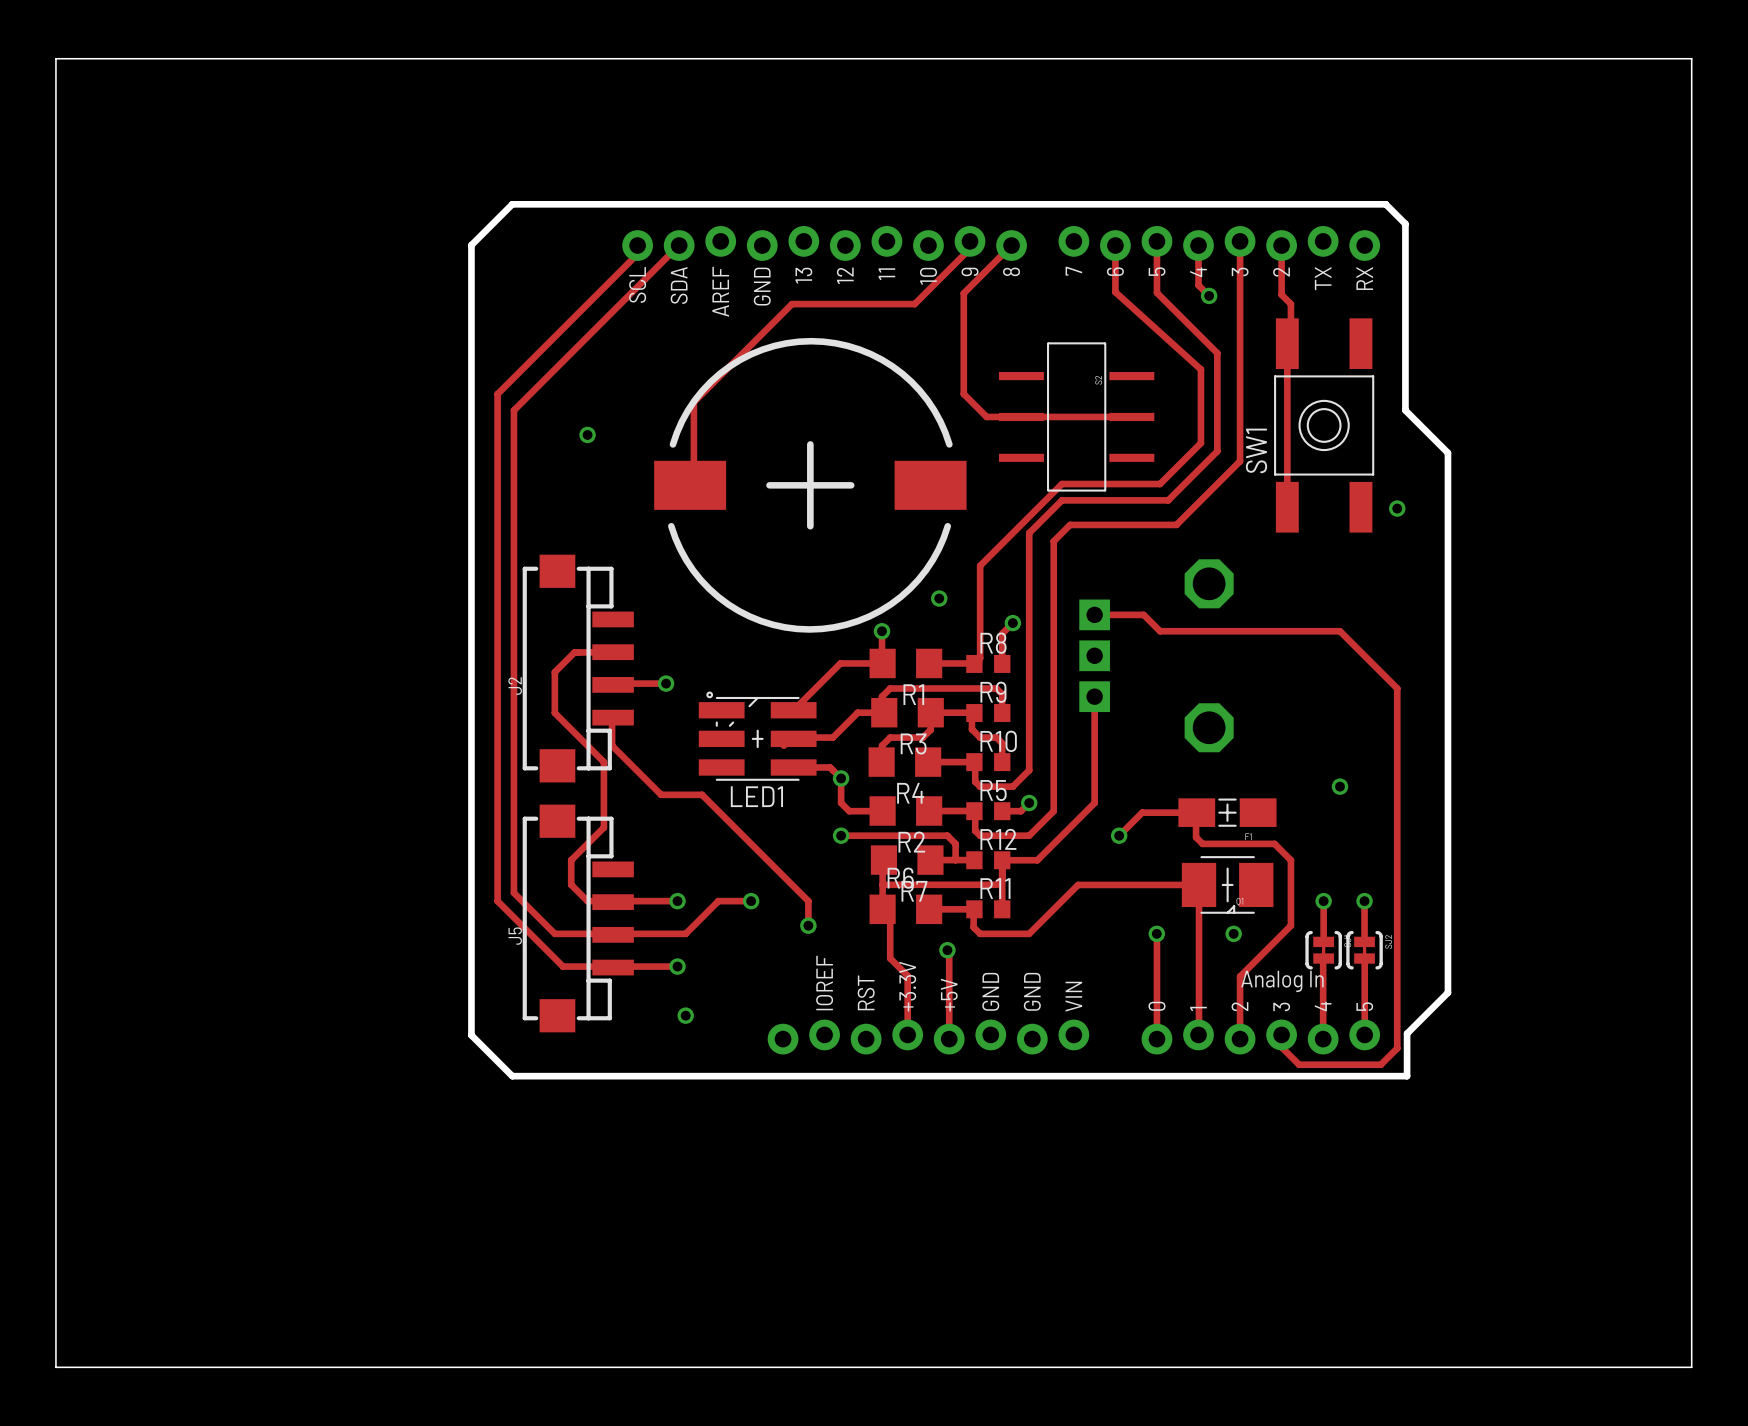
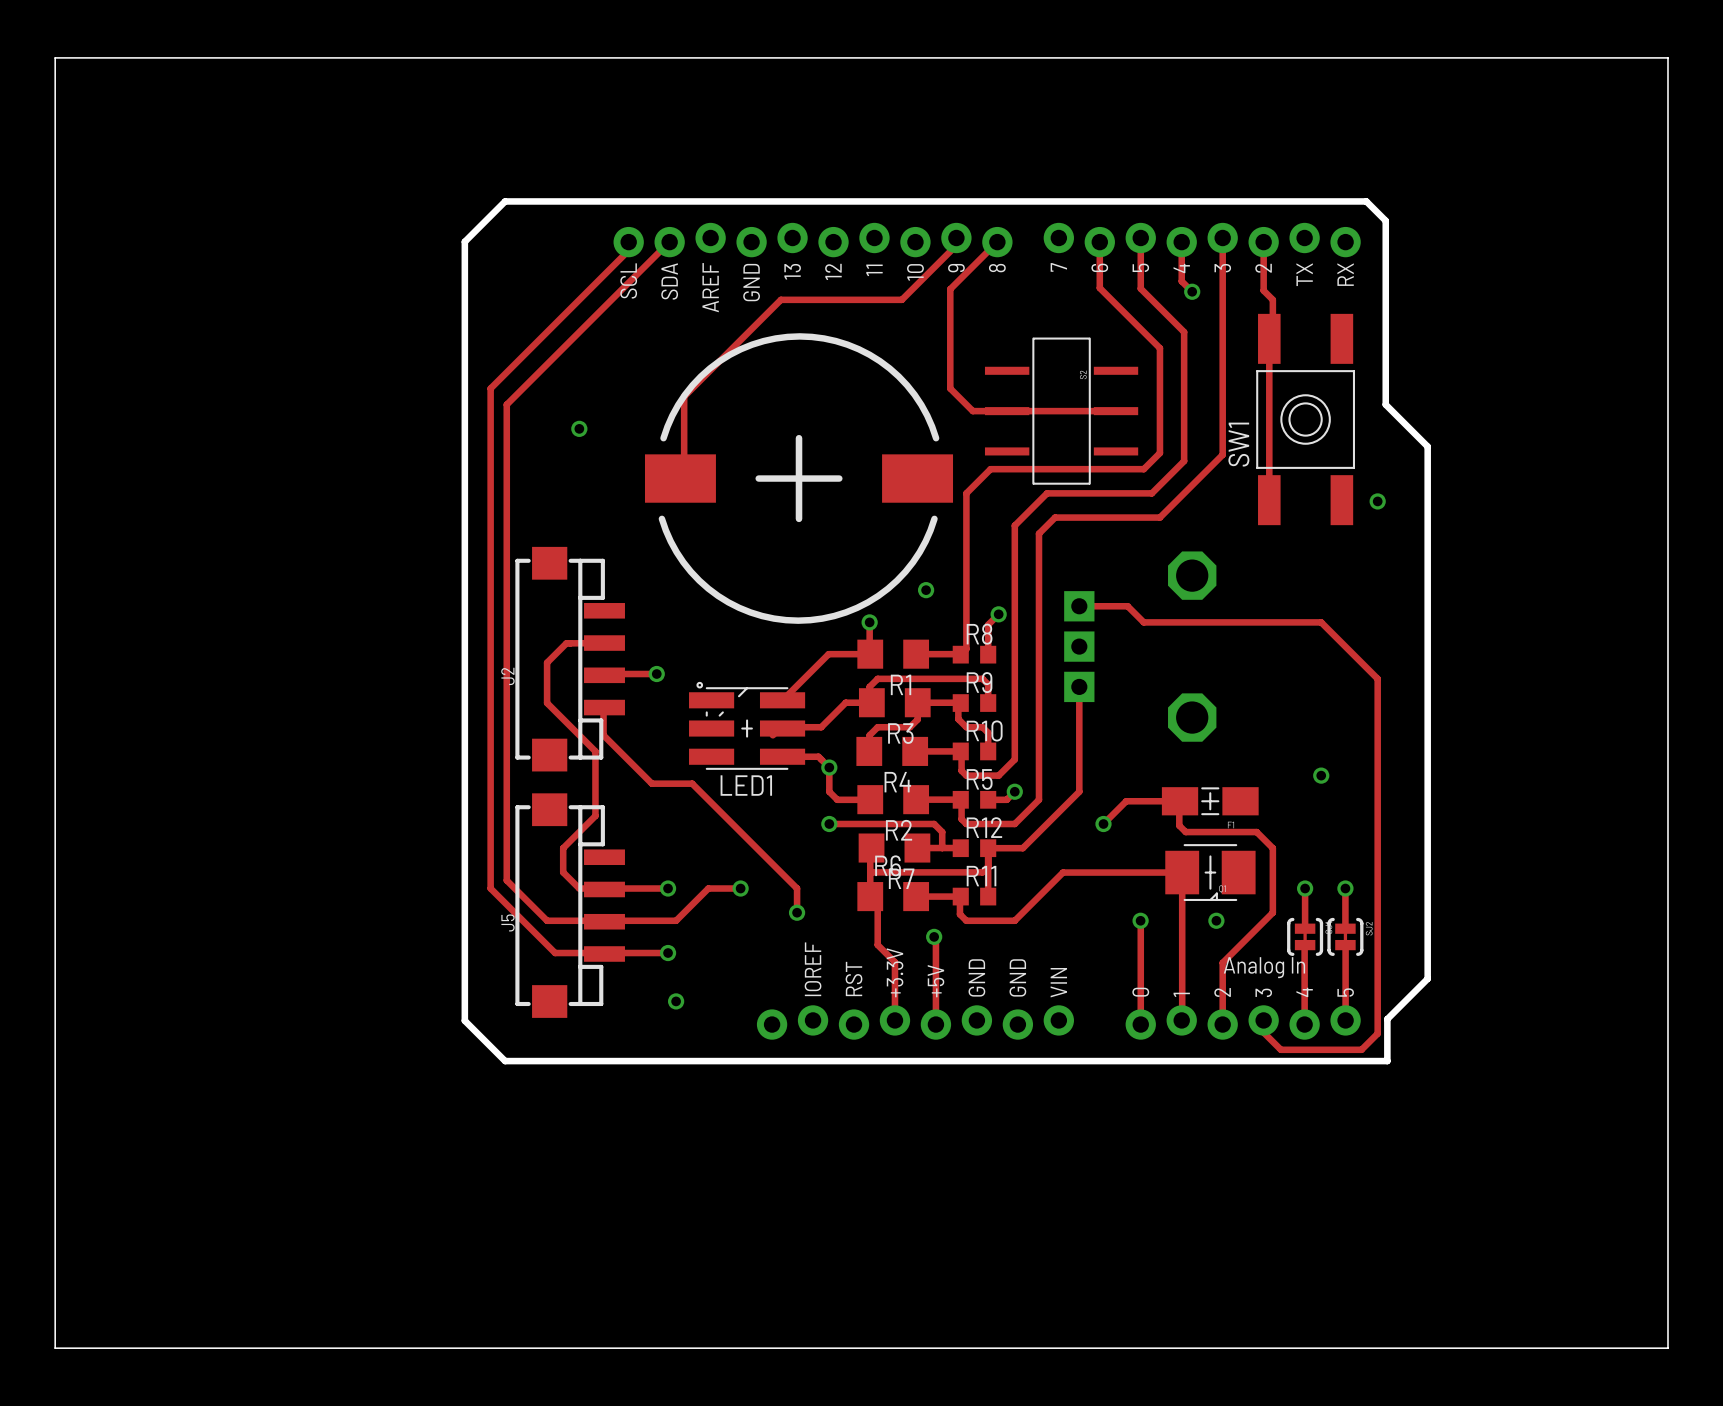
track: (1115, 292) (1200, 369) -> (1184, 332) (1184, 364)
track: (1200, 336) (1217, 353) (1217, 451) (1200, 467) -> (1184, 436) (1184, 461)
track: (1200, 443) (1160, 484) (1061, 484) (980, 565) -> (1099, 288) (1159, 348) (1159, 453) (1143, 469) (990, 469) (966, 493) (966, 557)

